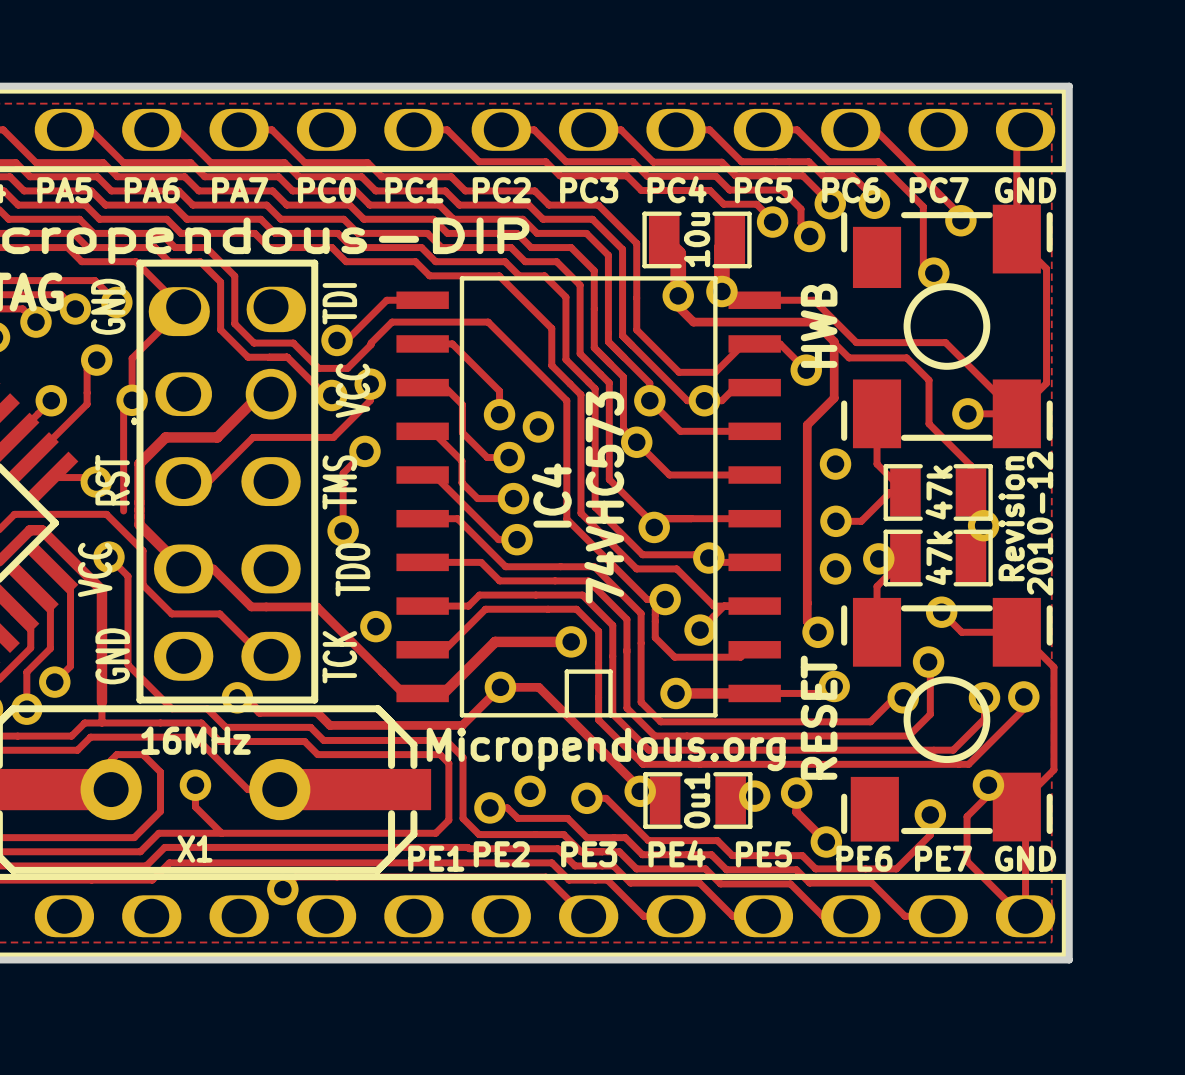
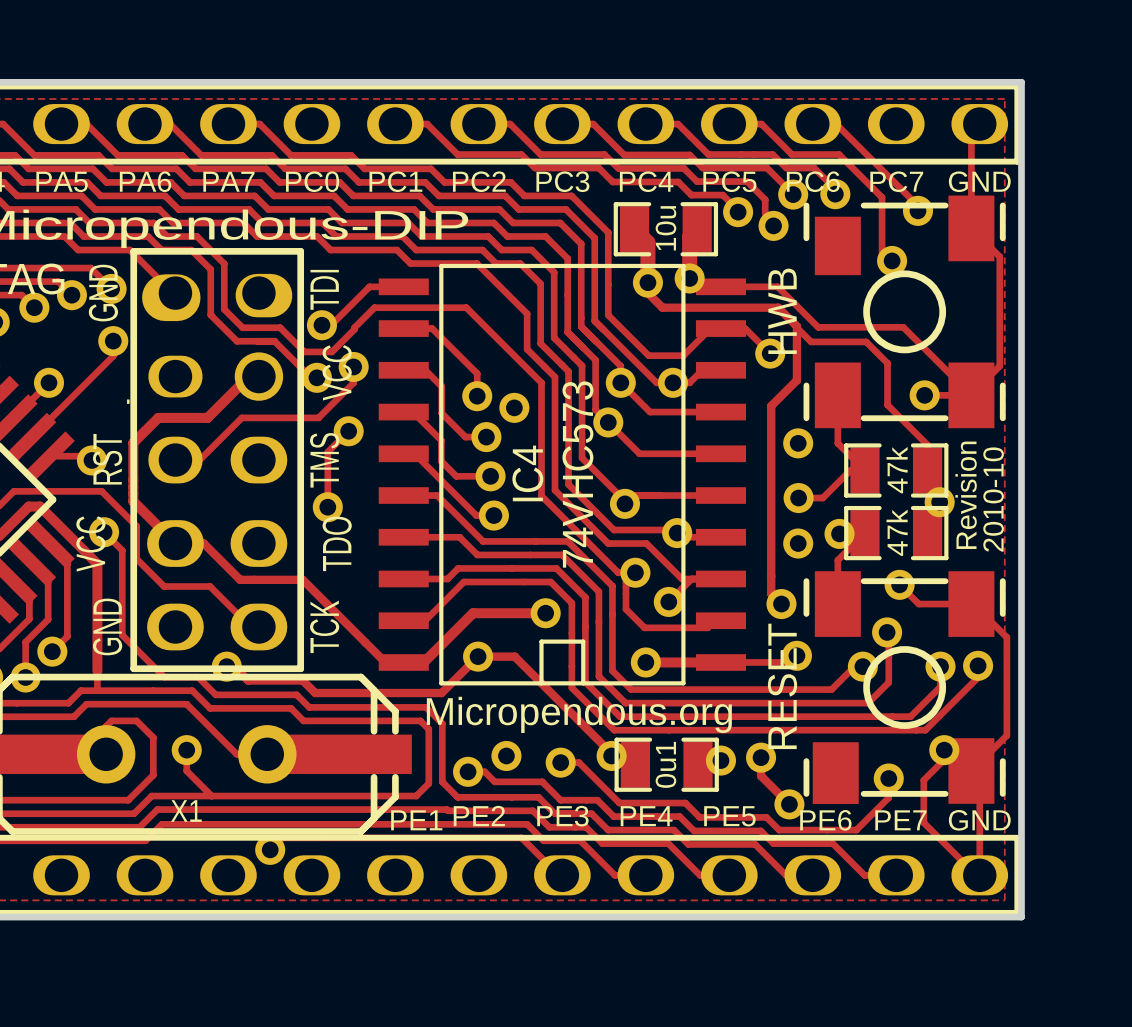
track: (183, 306) (132, 358) (132, 401) (123, 409) (123, 511) -> none
track: (96, 360) (87, 369) (87, 404) -> (113, 341) (113, 356) (83, 386)
part position: (96, 360) -> (113, 341)
part: (132, 400) -> none
text: 2010-12 (1040, 523) -> 2010-10 (993, 499)
part: (375, 626) -> none
X1 value: 16MHz (196, 740) -> none

